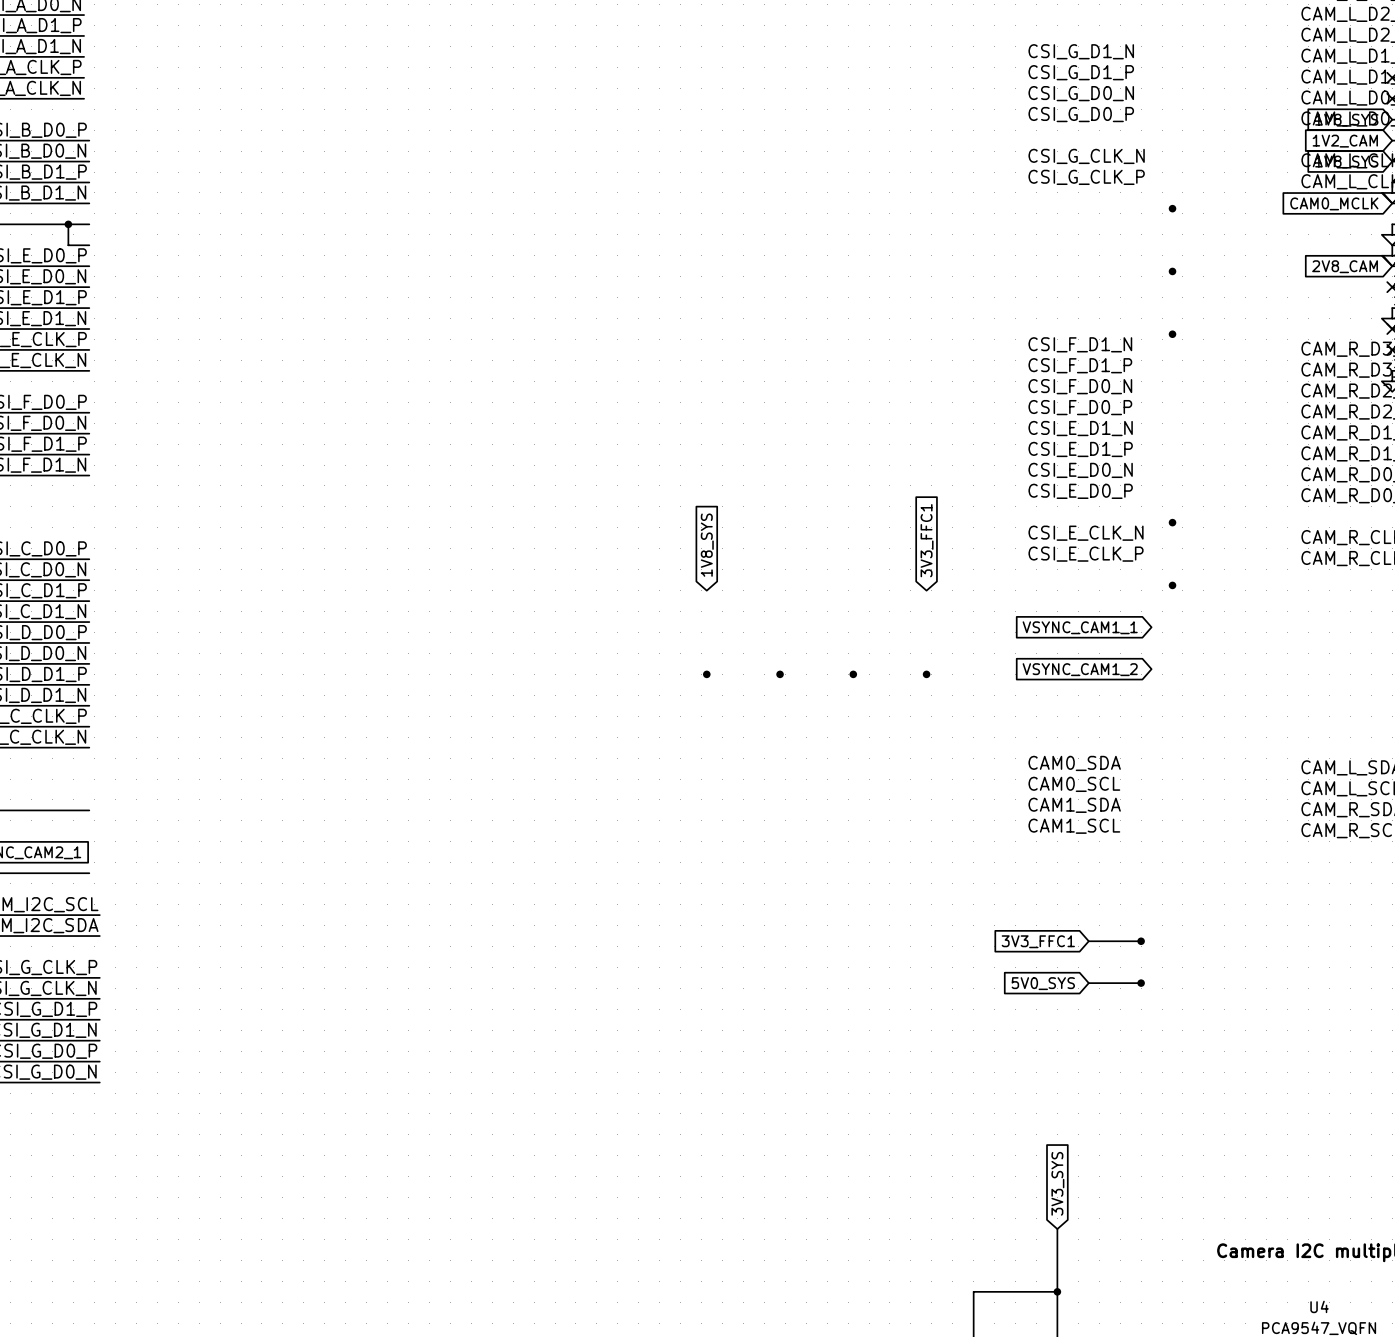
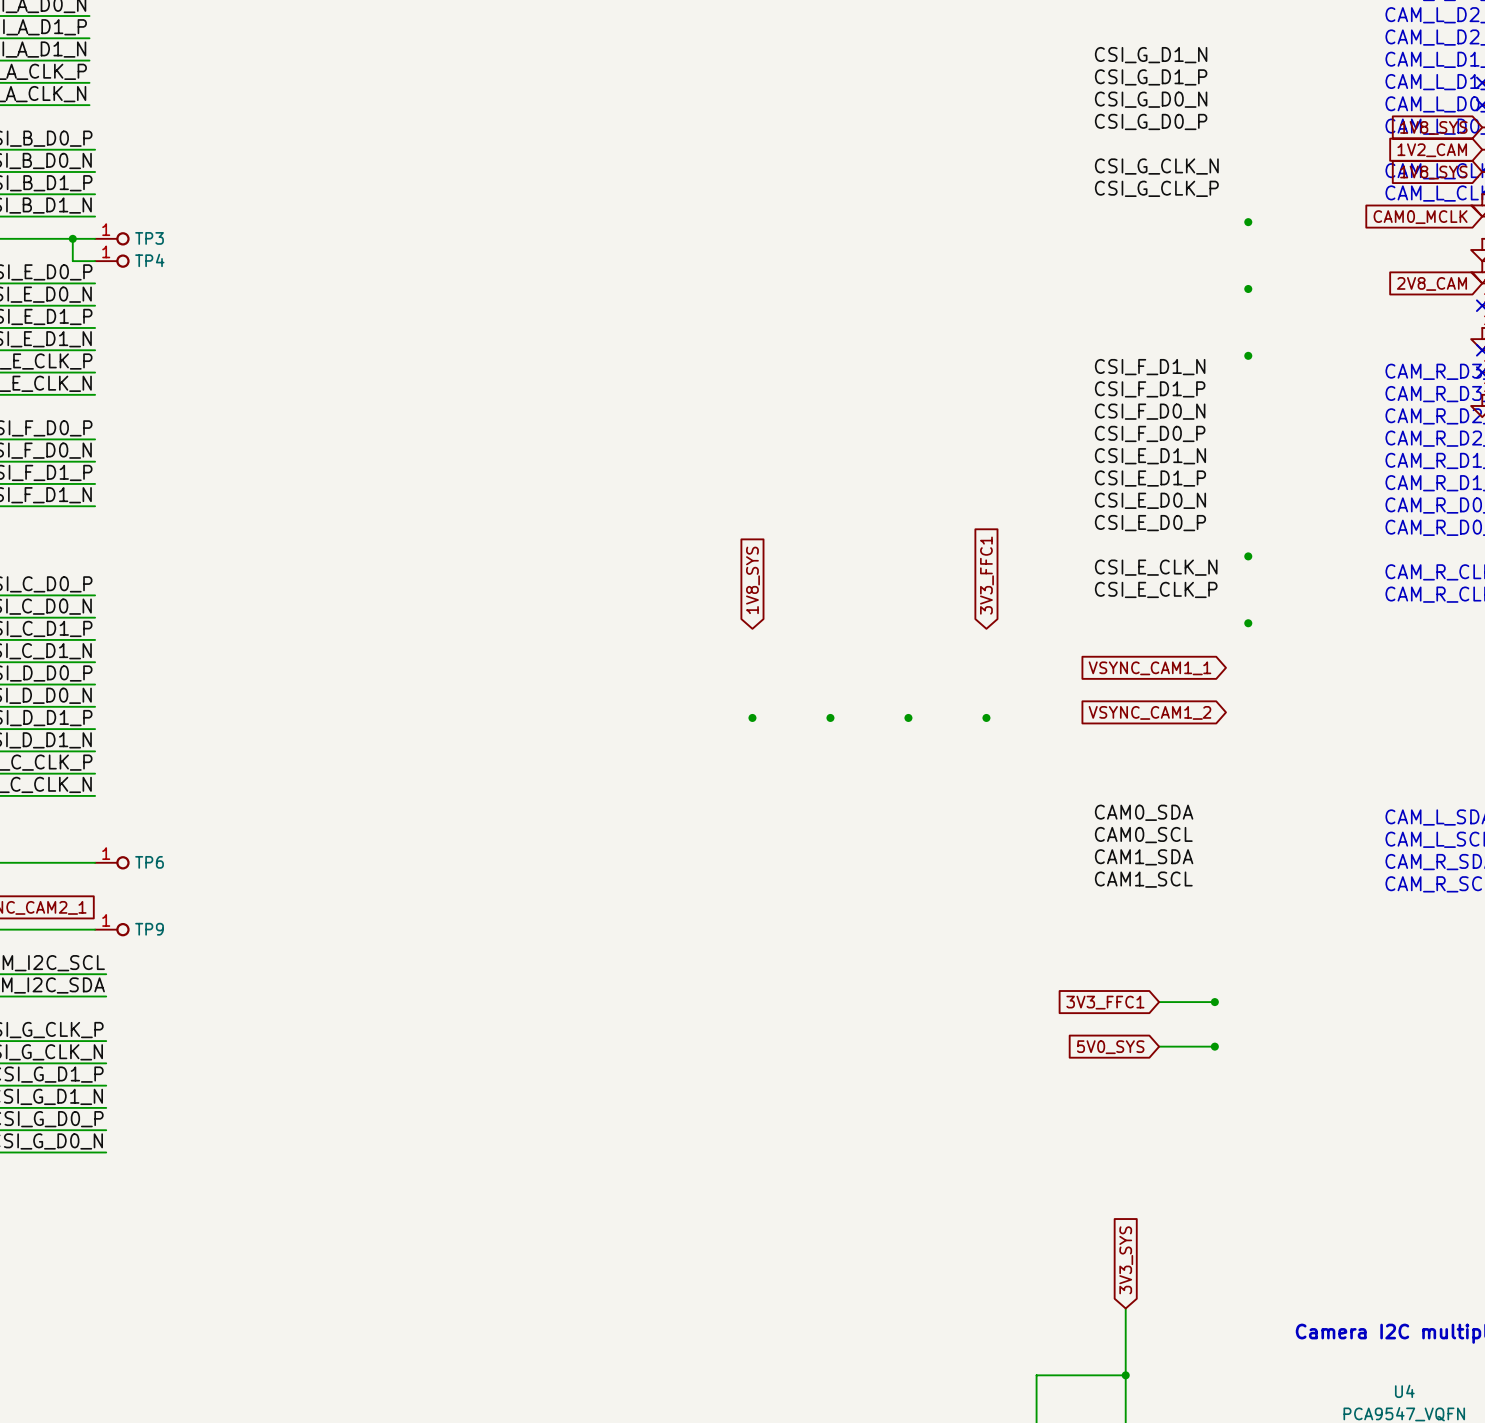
TP3: none -> (112, 238)
TP4: none -> (112, 261)
TP6: none -> (112, 862)
TP9: none -> (112, 929)

